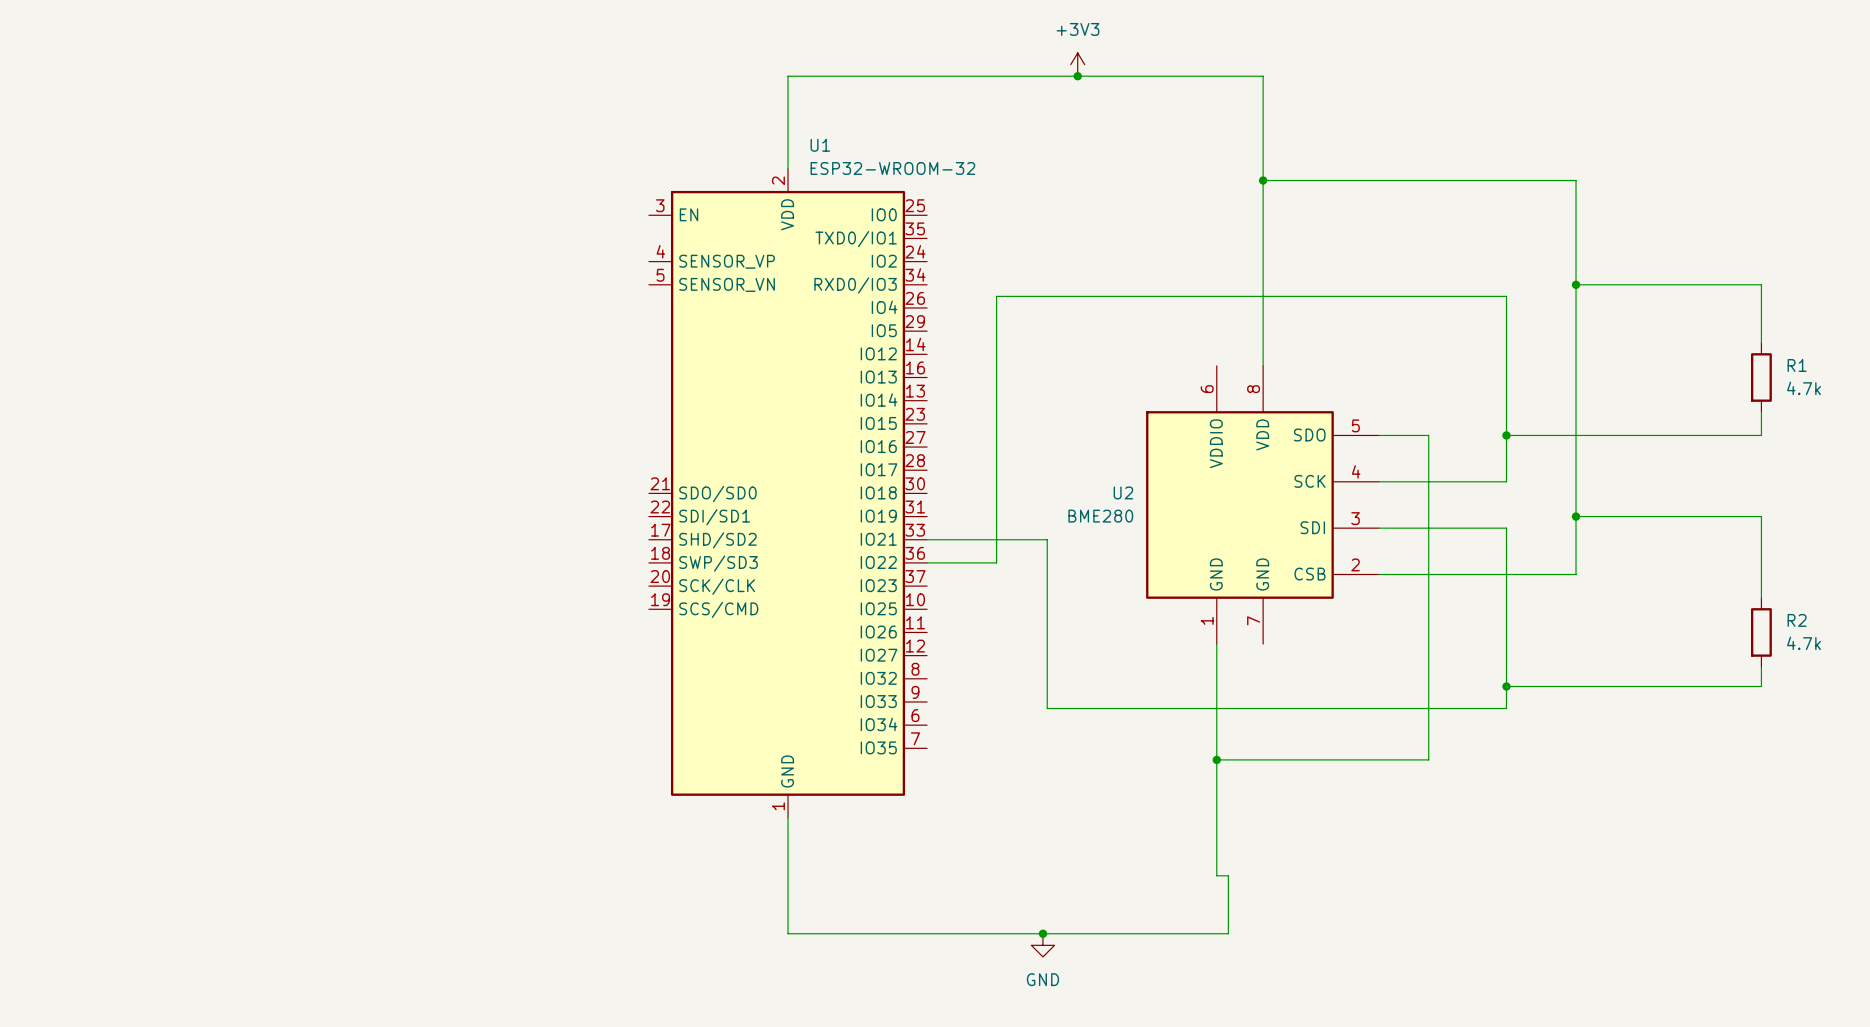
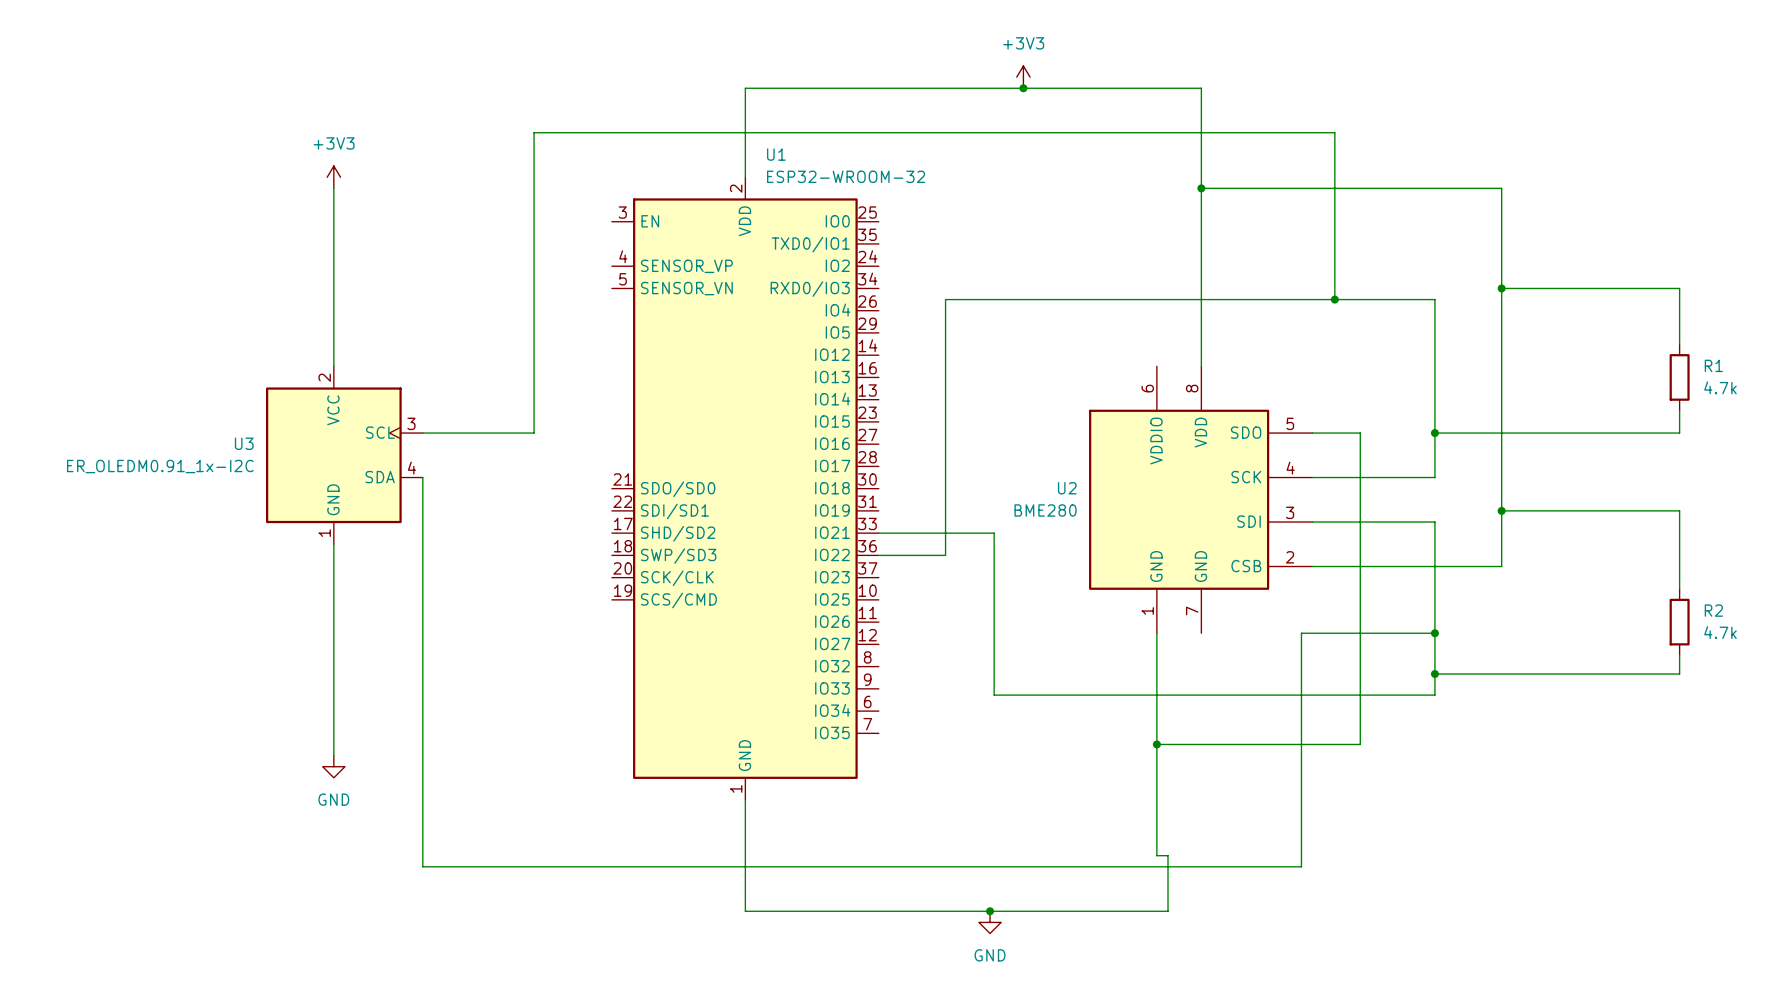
power symbol: none -> +3V3 (333, 177)
wire: none -> (333, 188) (333, 366)
wire: none -> (1334, 299) (1334, 132) (534, 132) (534, 433) (422, 433)
junction: none -> (1334, 299)
U3: none -> ER_OLEDM0.91_1x-I2C (344, 455)
wire: none -> (422, 477) (422, 866) (1301, 866) (1301, 633) (1434, 633)
wire: none -> (333, 544) (333, 755)
junction: none -> (1434, 633)
power symbol: none -> GND (333, 766)

